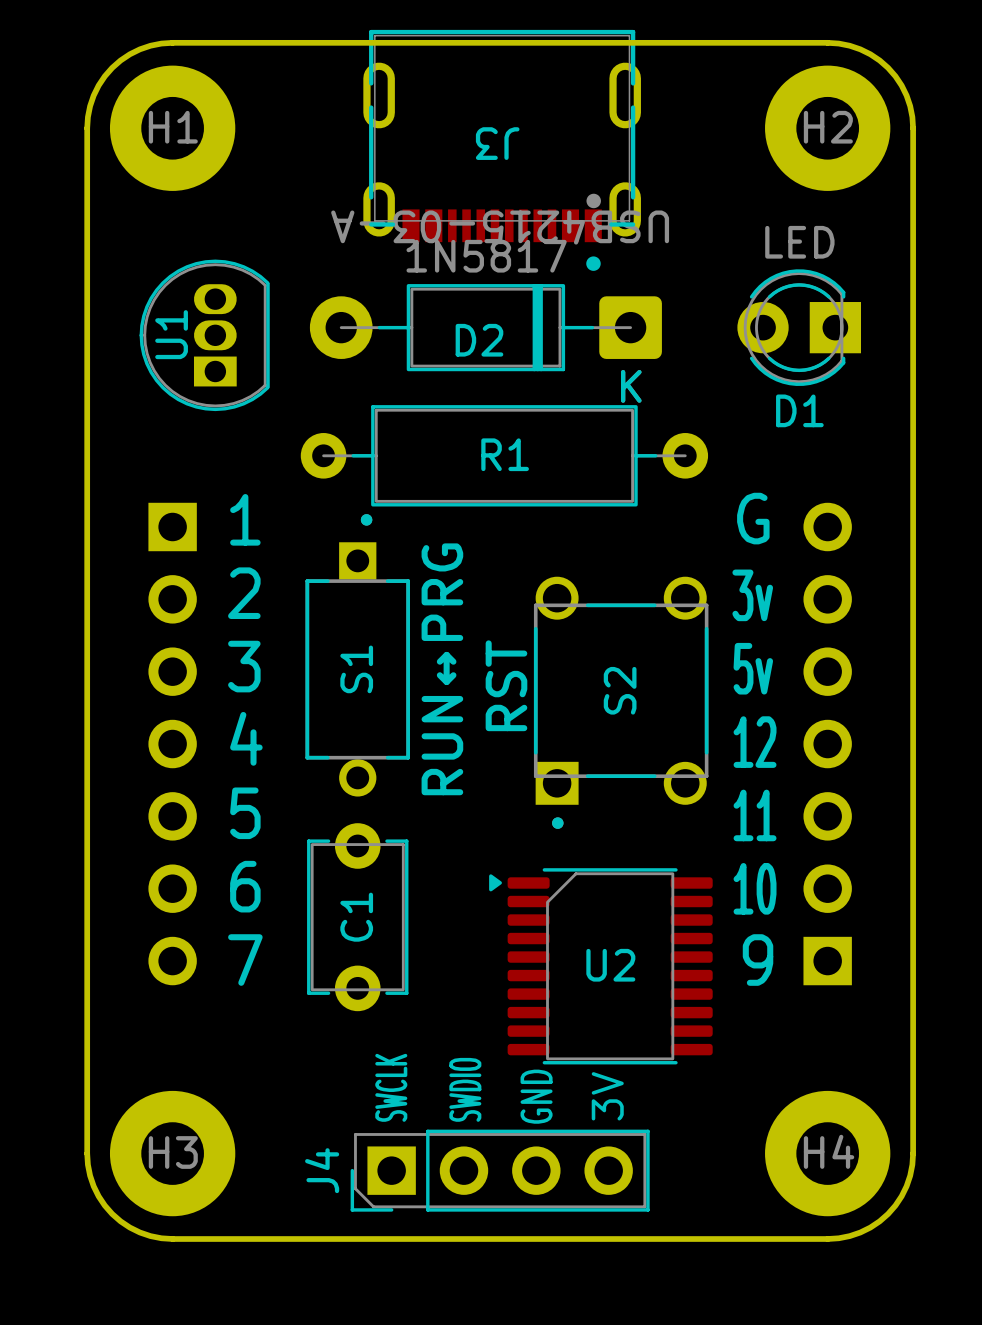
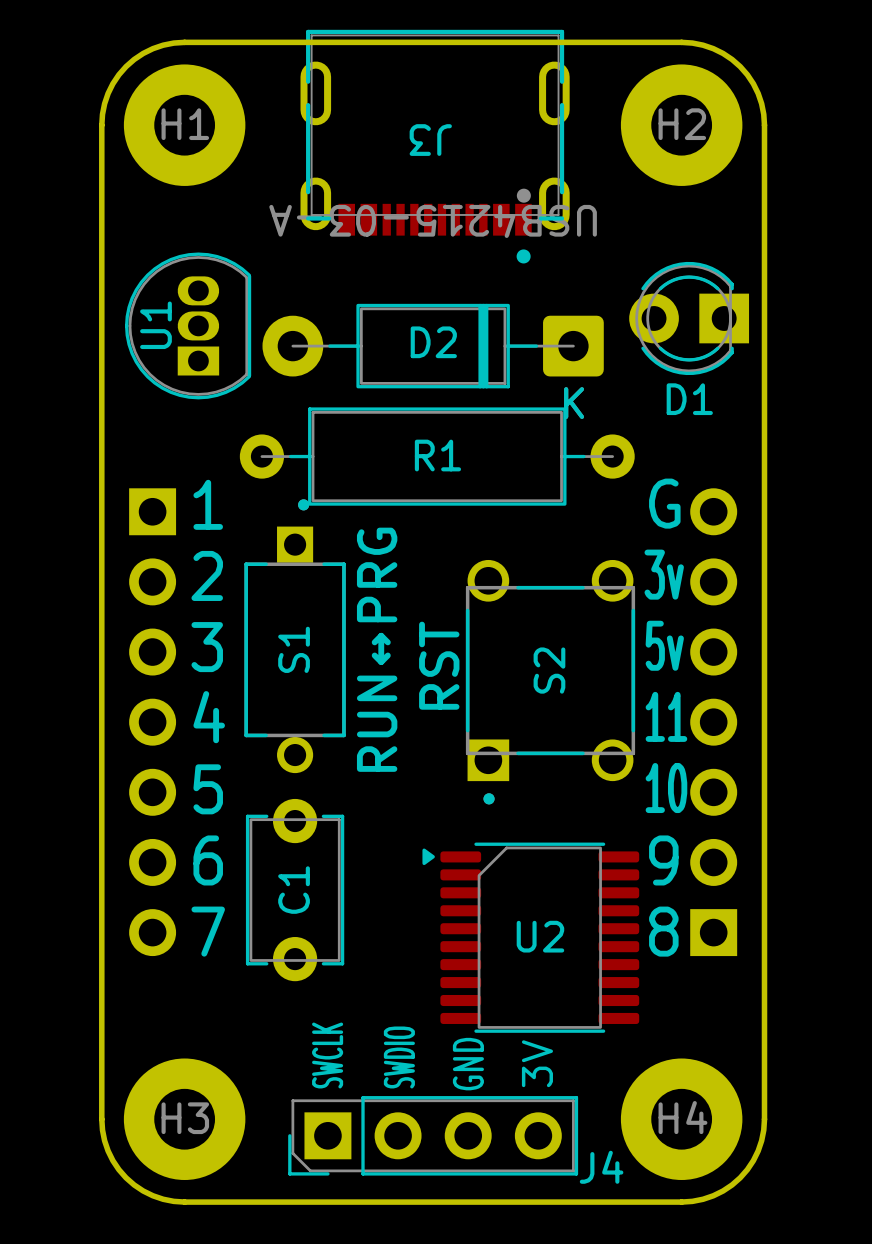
board edge: (243, 42) (161, 43) (129, 54) (112, 67) (98, 85) (90, 106) (87, 128) (87, 1164) (93, 1186) (104, 1205) (120, 1221) (139, 1232) (172, 1239) (243, 1239) -> (184, 42) (152, 48) (126, 66) (108, 93) (101, 125) (102, 1130) (112, 1160) (134, 1184) (163, 1199) (184, 1202)
board edge: (756, 42) (838, 43) (870, 54) (888, 67) (901, 85) (910, 106) (913, 128) (912, 1164) (906, 1186) (895, 1205) (879, 1221) (860, 1232) (827, 1239) (756, 1239) -> (681, 42) (713, 48) (740, 66) (758, 93) (764, 125) (763, 1130) (753, 1160) (732, 1184) (703, 1199) (681, 1202)
H1 position: (172, 128) -> (184, 125)
H2 position: (827, 128) -> (681, 125)
D1 value: LED (799, 242) -> none
D2 value: 1N5817 (486, 256) -> none
D2 position: (485, 327) -> (433, 346)
D1 position: (799, 327) -> (689, 318)
U1 position: (204, 335) -> (188, 325)
D2 name position: D2 (479, 340) -> D2 (433, 342)
R1 position: (504, 455) -> (437, 456)
text position: G (753, 518) -> G (664, 503)
text position: 1 (245, 519) -> 1 (208, 504)
text position: 2 (244, 593) -> 2 (207, 575)
text position: 3v (752, 595) -> 3v (664, 574)
text position: 3 (244, 666) -> 3 (207, 647)
text position: 5v (753, 668) -> 5v (664, 645)
text position: 4 (246, 738) -> 4 (209, 717)
text: 12 (755, 742) -> none
part position: (172, 744) -> (152, 722)
part position: (827, 744) -> (713, 722)
text position: 5 (245, 813) -> 5 (208, 789)
text position: 11 (755, 815) -> 11 (666, 716)
text position: 6 (245, 886) -> 6 (208, 860)
text position: 10 (755, 888) -> 10 (666, 788)
text position: 7 (245, 960) -> 7 (208, 931)
text: none -> 8 (663, 931)
text position: 9 (758, 960) -> 9 (663, 860)
H3 position: (172, 1153) -> (184, 1119)
H4 position: (827, 1153) -> (681, 1119)
J4 name rotation: 0° (322, 1170) -> 90° clockwise (601, 1167)
J4 name position: J4 (322, 1170) -> J4 (601, 1167)

